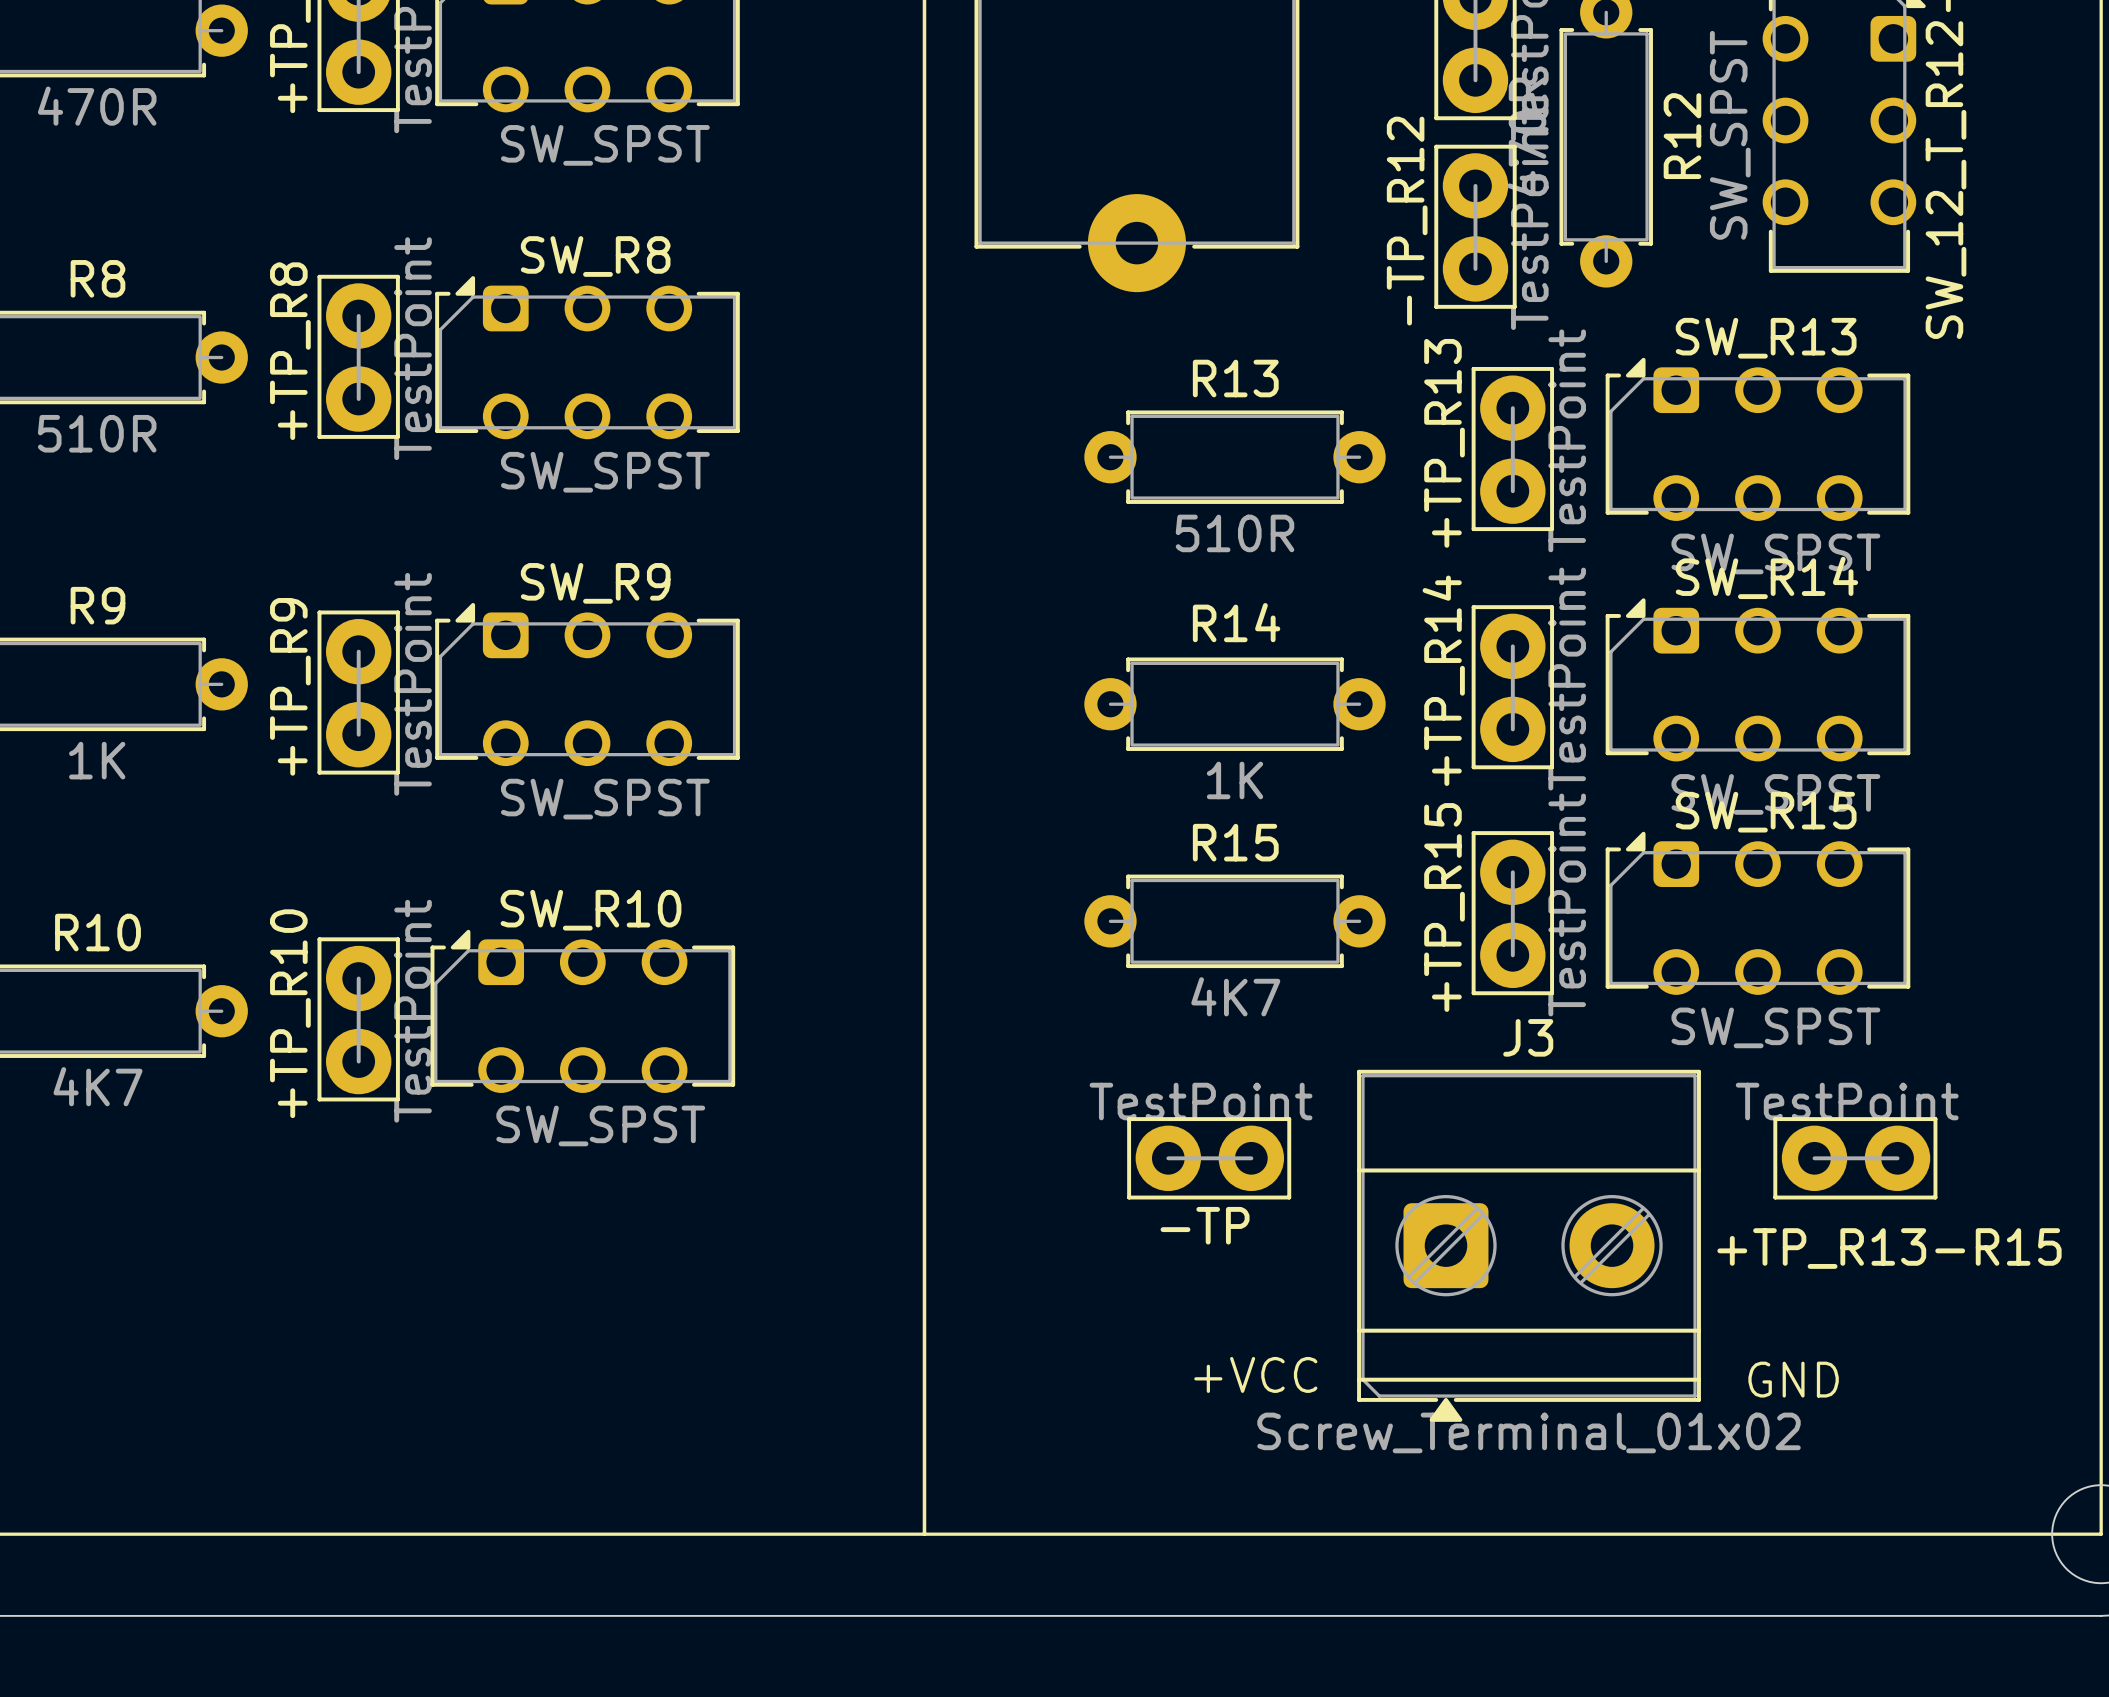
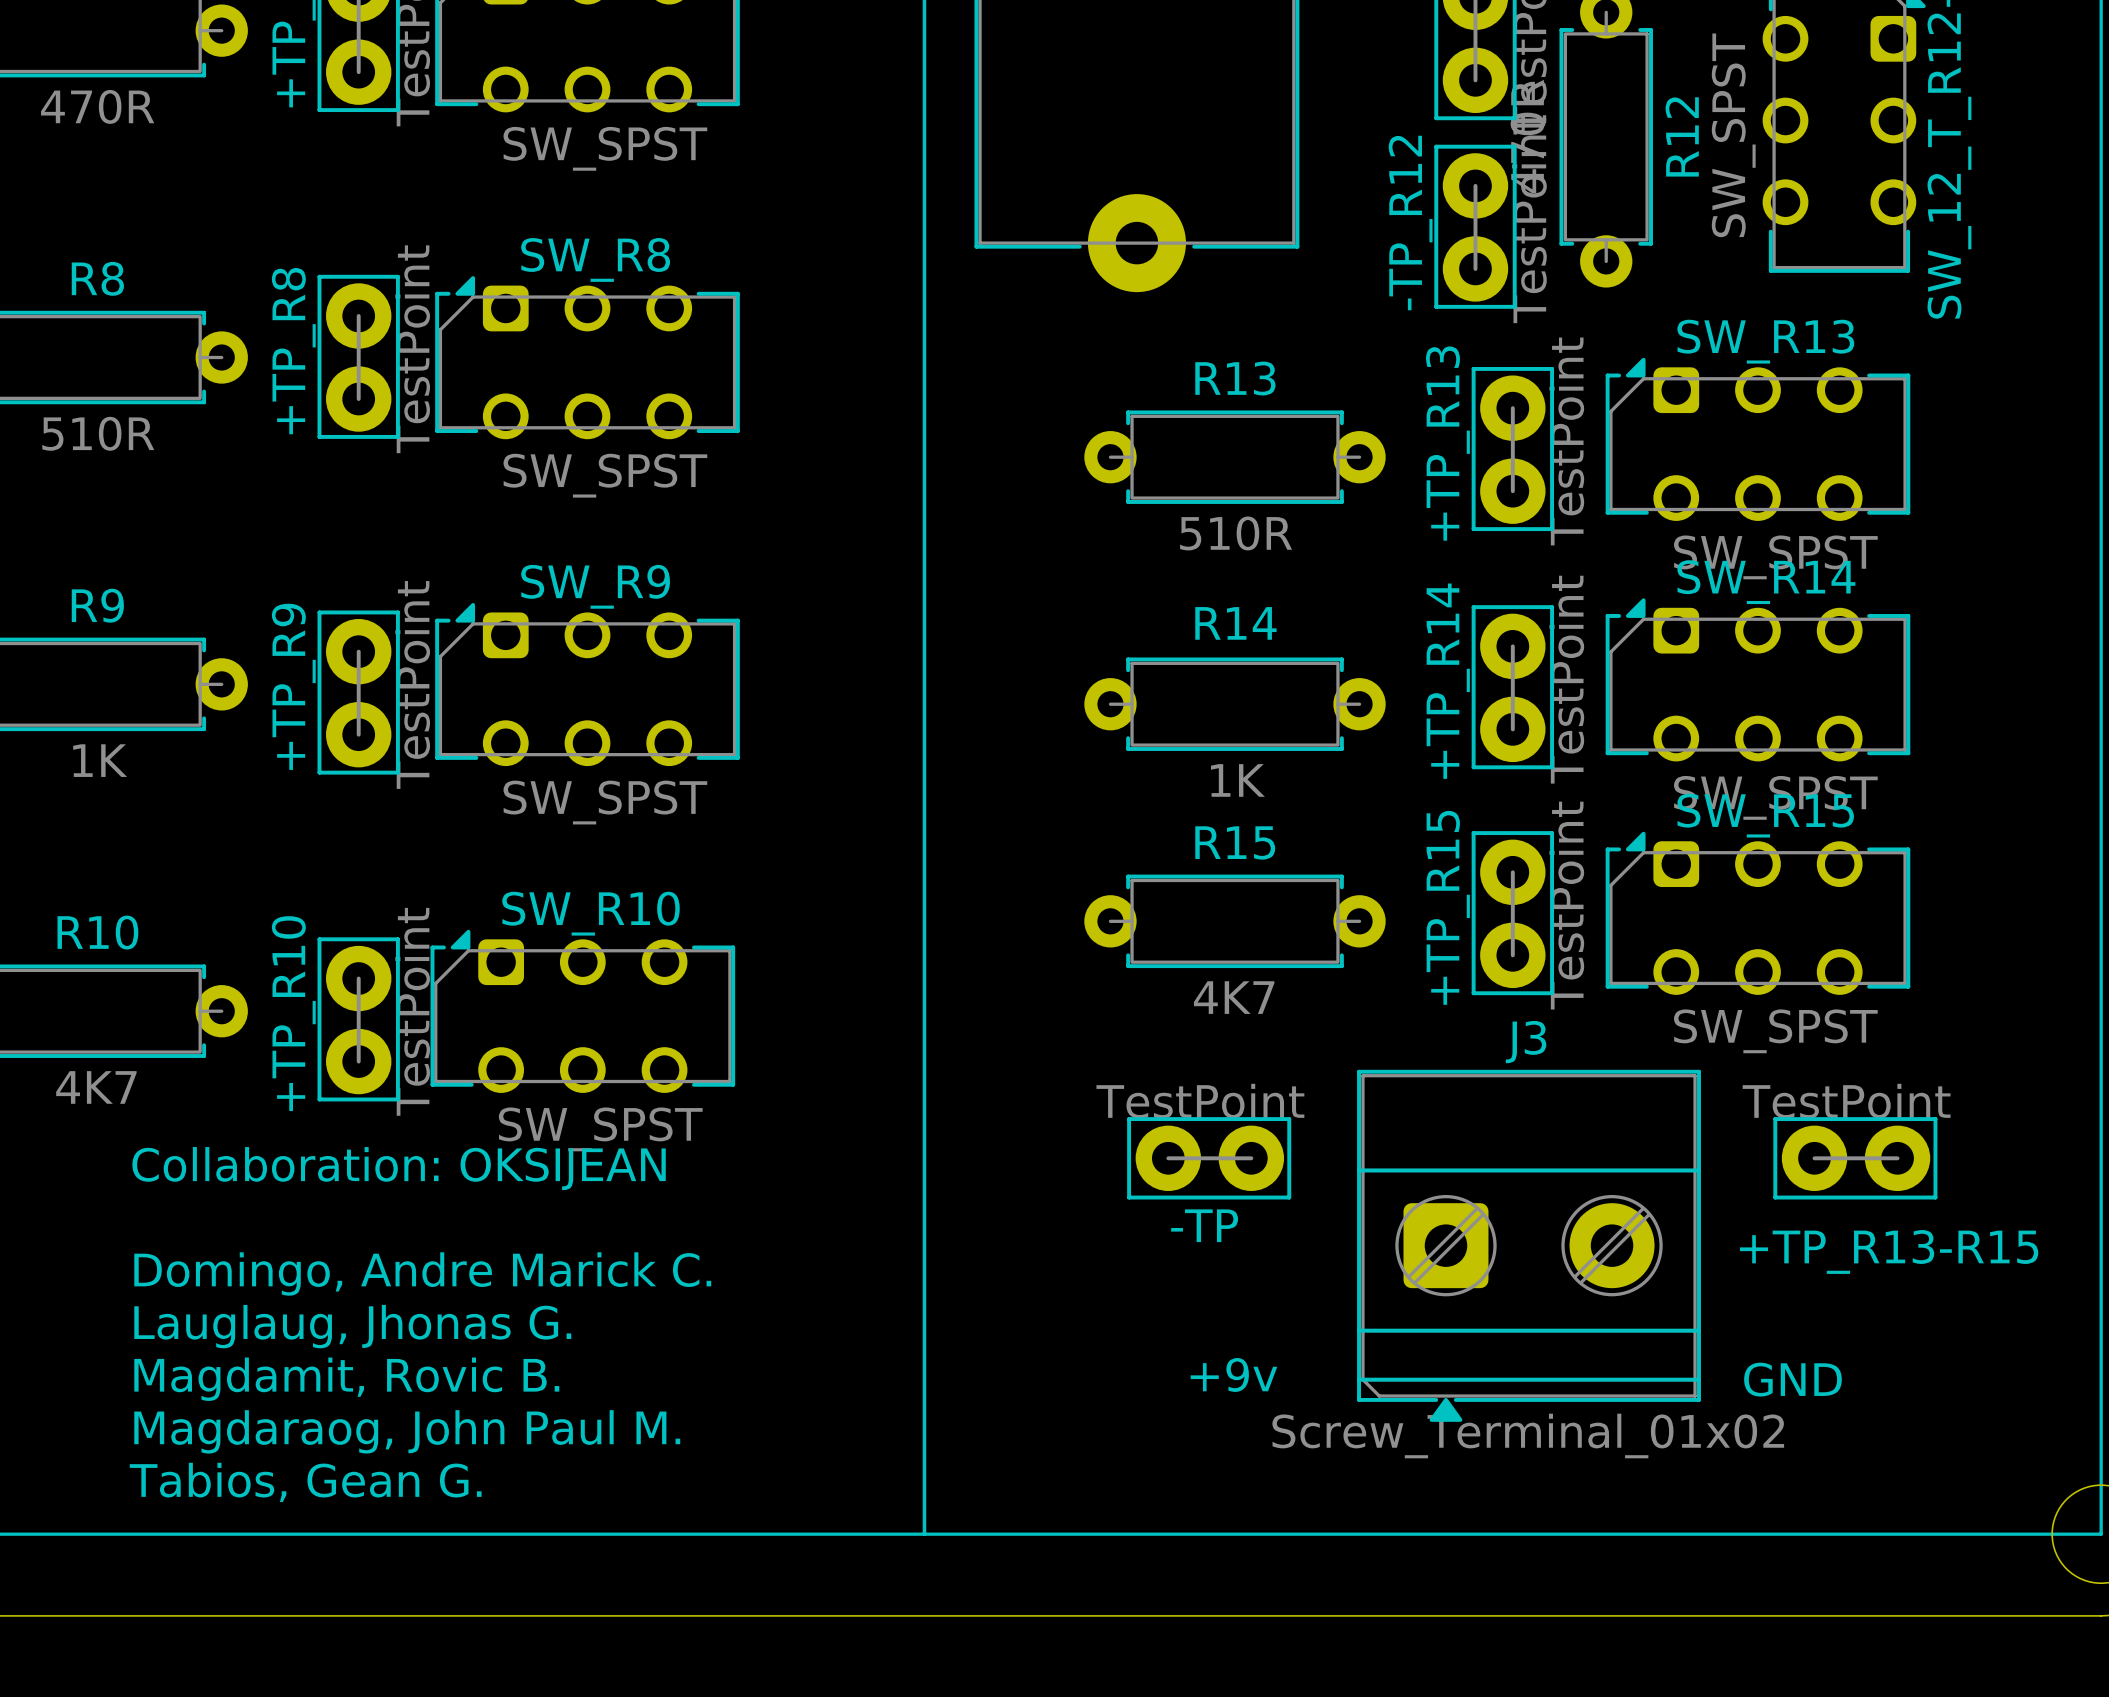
text: none -> Collaboration: OKSIJEAN (399, 1168)
text: none -> Domingo, Andre Marick C. (422, 1273)
text: none -> Lauglaug, Jhonas G. (352, 1326)
text: +VCC (1255, 1374) -> +9v (1233, 1374)
text: none -> Magdamit, Rovic B. (346, 1379)
text: none -> Magdaraog, John Paul M. (407, 1431)
text: none -> Tabios, Gean G. (305, 1482)

